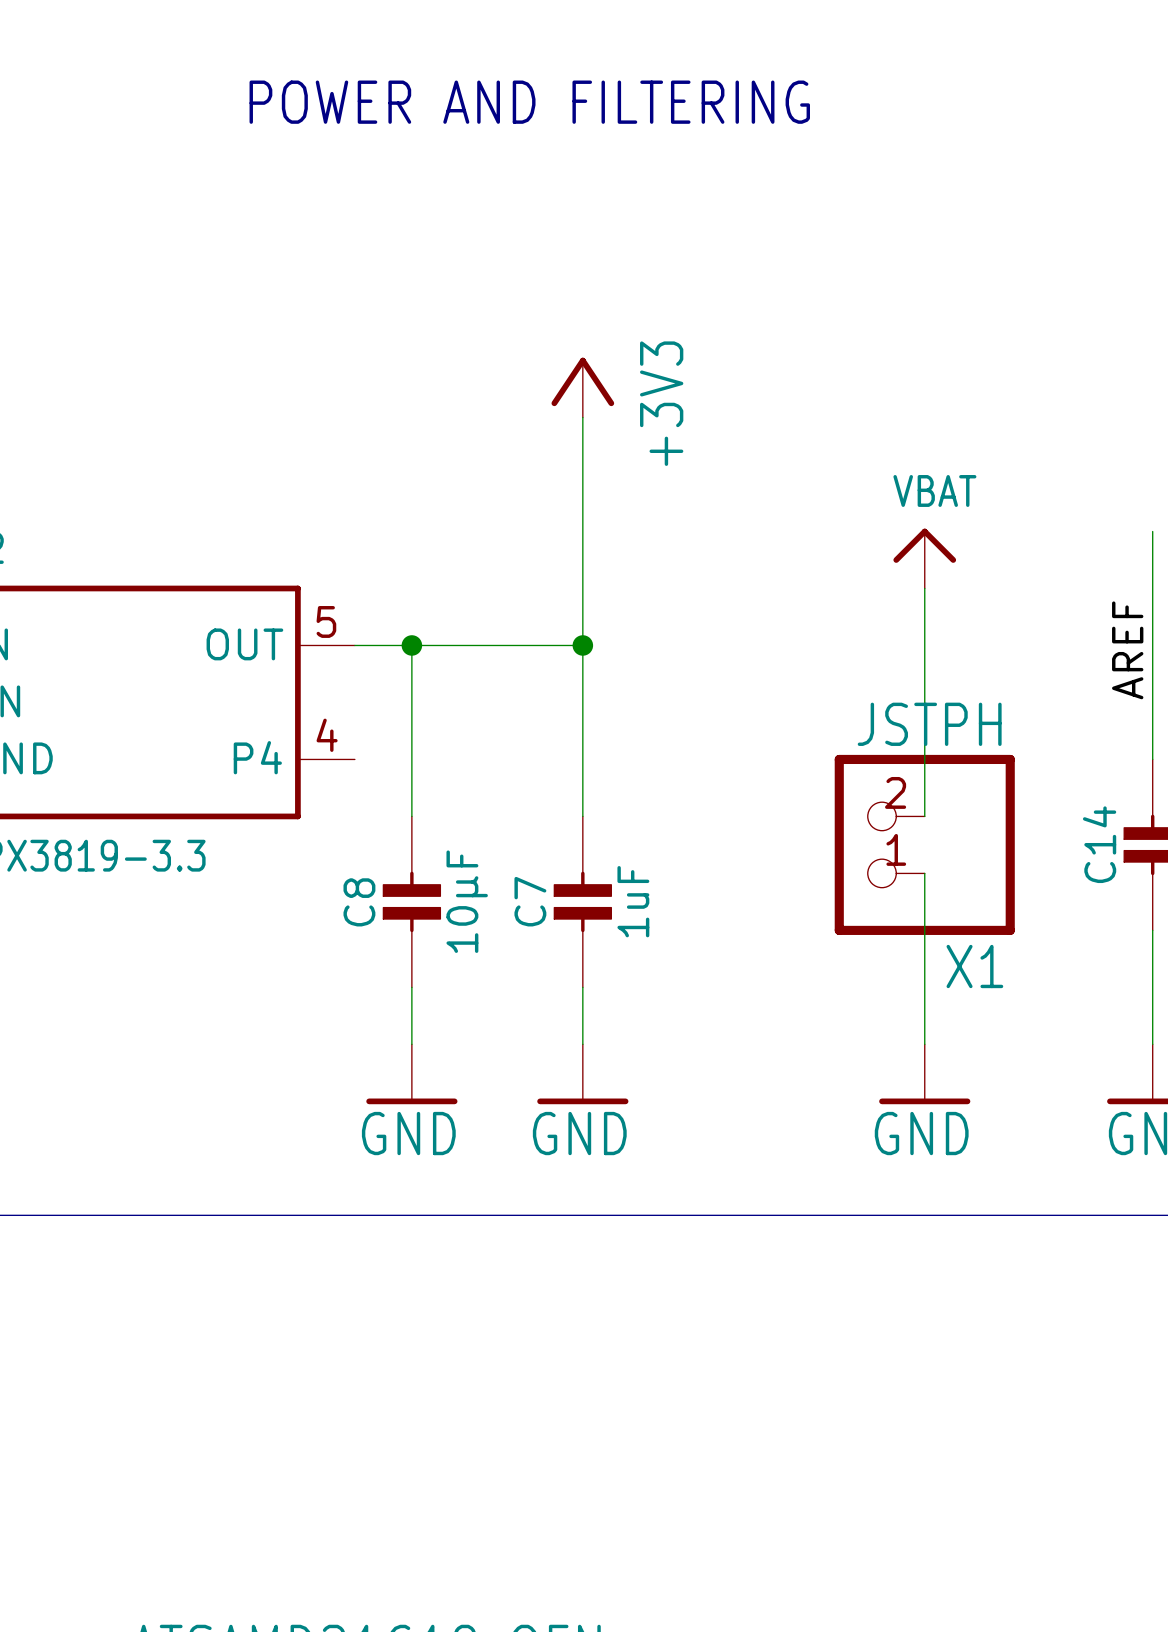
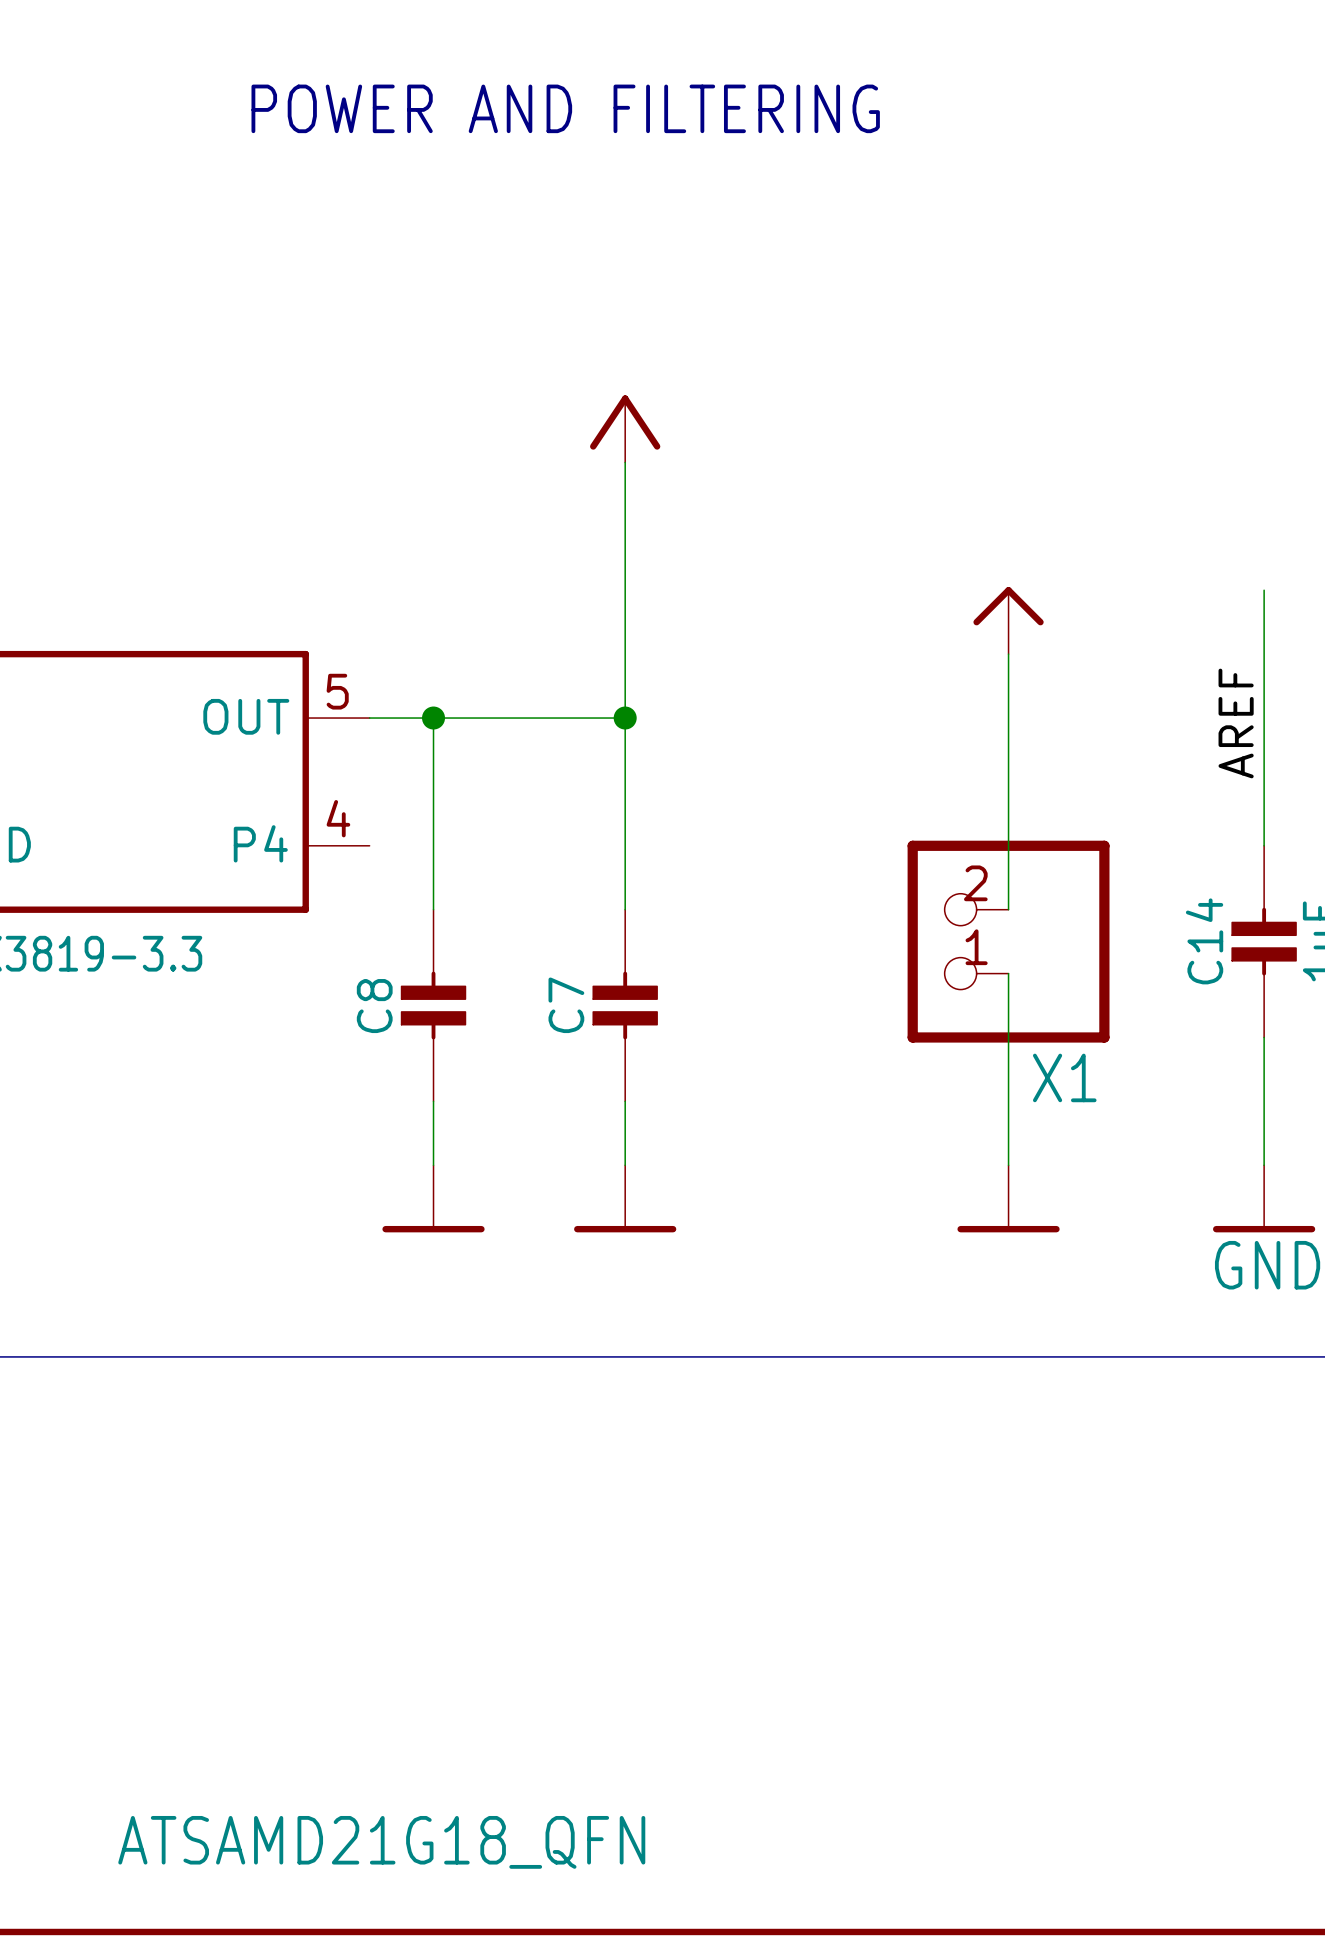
power symbol text: +3V3 (661, 403) -> none
power symbol text: VBAT (934, 490) -> none
X1 value: JSTPH (929, 724) -> none
C8 value: 10µF (467, 901) -> none
C7 value: 1uF (633, 901) -> none
power symbol text: GND (408, 1133) -> none
power symbol text: GND (579, 1133) -> none
power symbol text: GND (921, 1133) -> none

